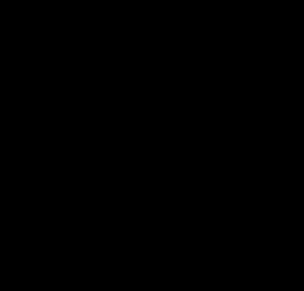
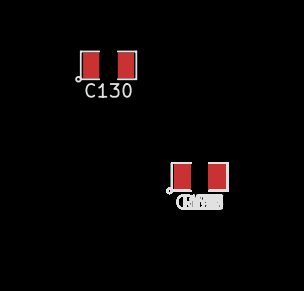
C130: none -> (106, 66)
part: none -> (197, 178)
part: none -> (197, 178)
part: none -> (197, 178)
part: none -> (197, 178)
part: none -> (197, 178)
part: none -> (197, 178)
part: none -> (197, 178)
part: none -> (197, 178)
part: none -> (197, 178)
part: none -> (197, 178)
part: none -> (197, 178)
part: none -> (197, 178)
part: none -> (197, 178)
part: none -> (197, 178)
part: none -> (197, 178)
part: none -> (197, 178)
part: none -> (197, 178)
part: none -> (197, 178)
part: none -> (197, 178)
part: none -> (197, 178)
part: none -> (197, 178)
part: none -> (197, 178)
part: none -> (197, 178)
part: none -> (197, 178)
part: none -> (197, 178)
part: none -> (197, 178)

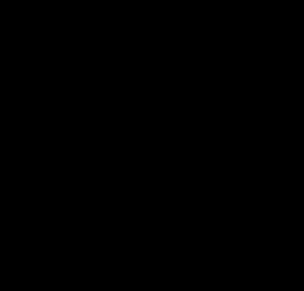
C130: (106, 66) -> none
part: (197, 178) -> none
part: (197, 178) -> none
part: (197, 178) -> none
part: (197, 178) -> none
part: (197, 178) -> none
part: (197, 178) -> none
part: (197, 178) -> none
part: (197, 178) -> none
part: (197, 178) -> none
part: (197, 178) -> none
part: (197, 178) -> none
part: (197, 178) -> none
part: (197, 178) -> none
part: (197, 178) -> none
part: (197, 178) -> none
part: (197, 178) -> none
part: (197, 178) -> none
part: (197, 178) -> none
part: (197, 178) -> none
part: (197, 178) -> none
part: (197, 178) -> none
part: (197, 178) -> none
part: (197, 178) -> none
part: (197, 178) -> none
part: (197, 178) -> none
part: (197, 178) -> none

